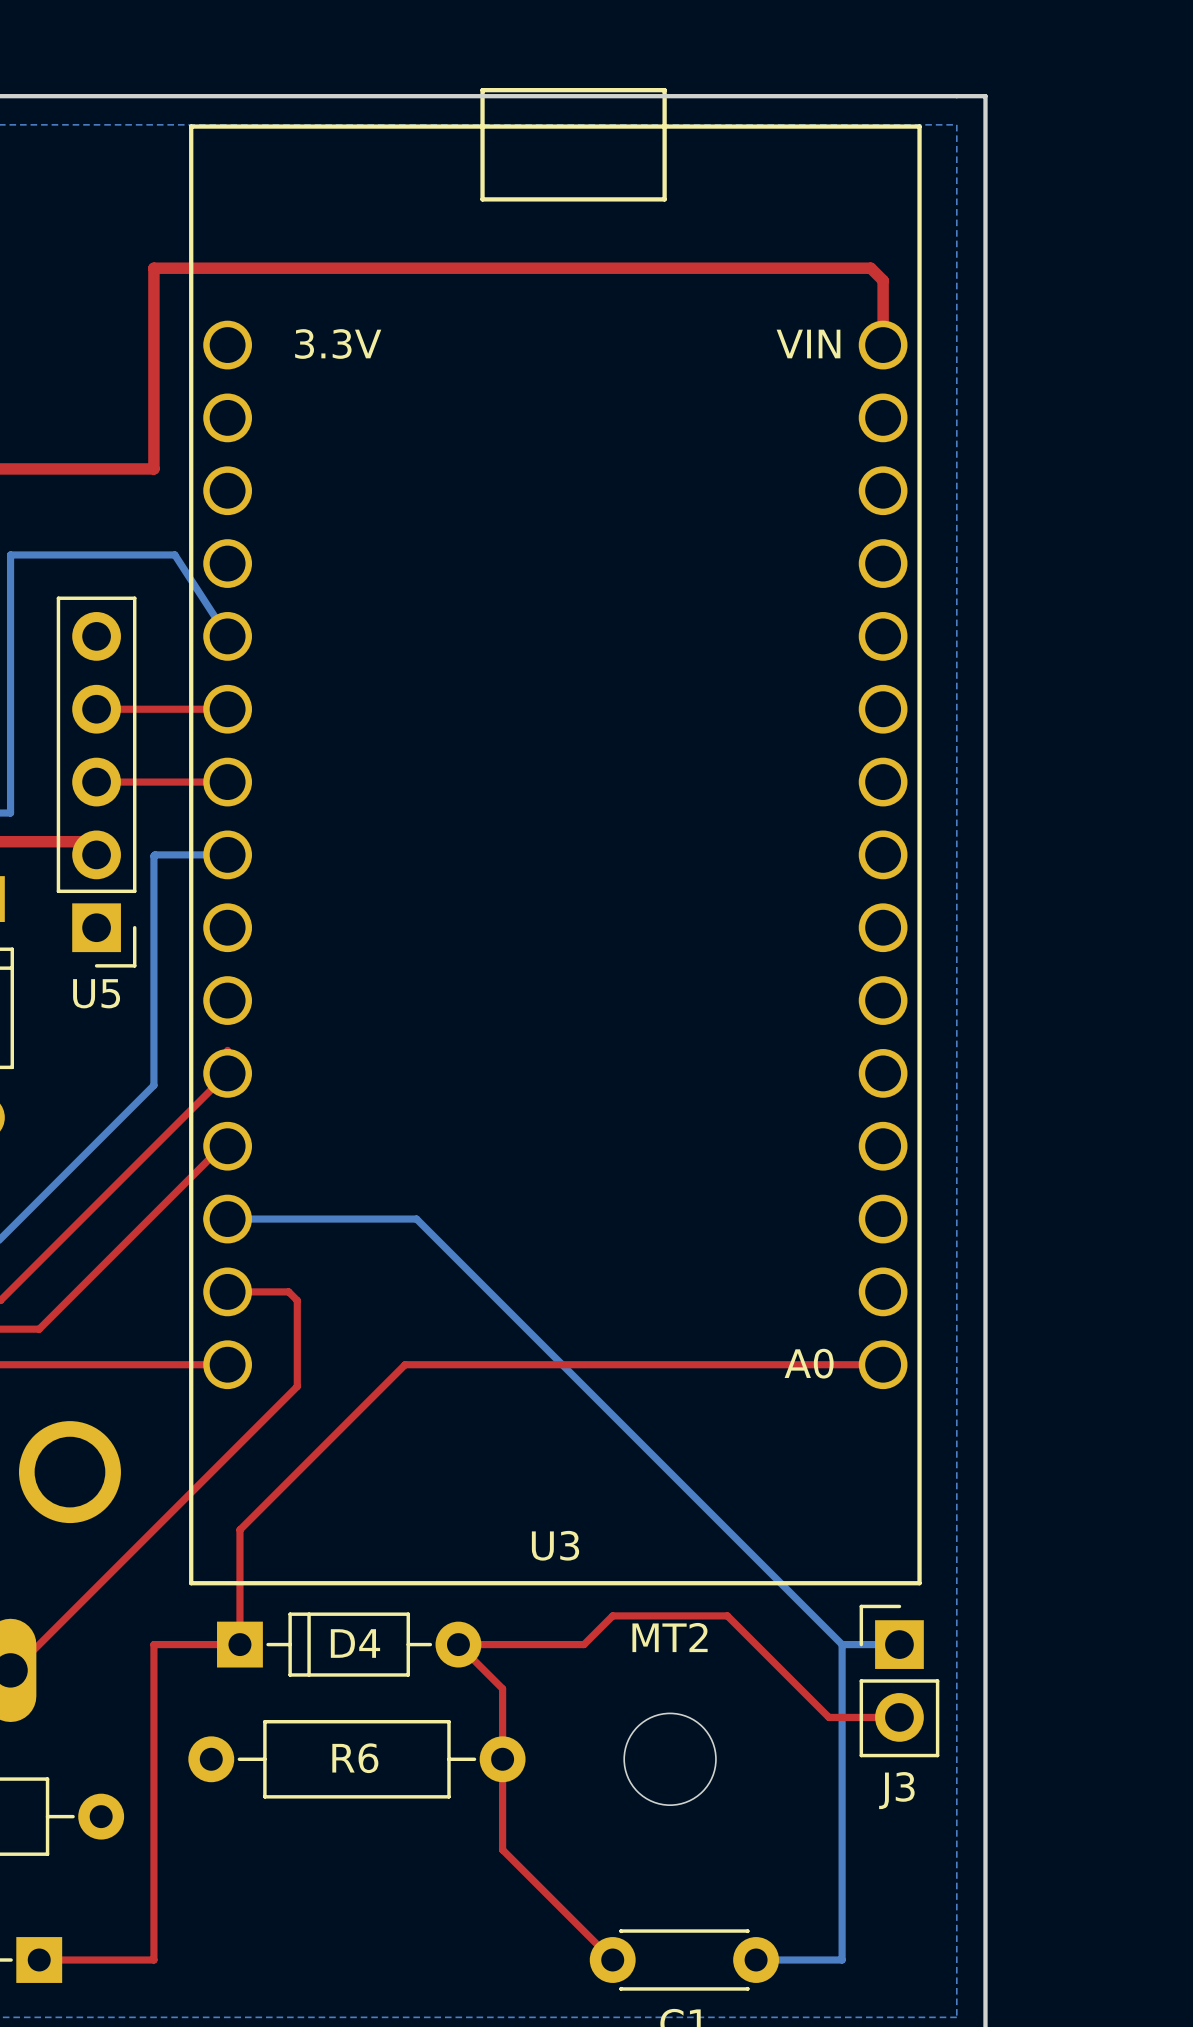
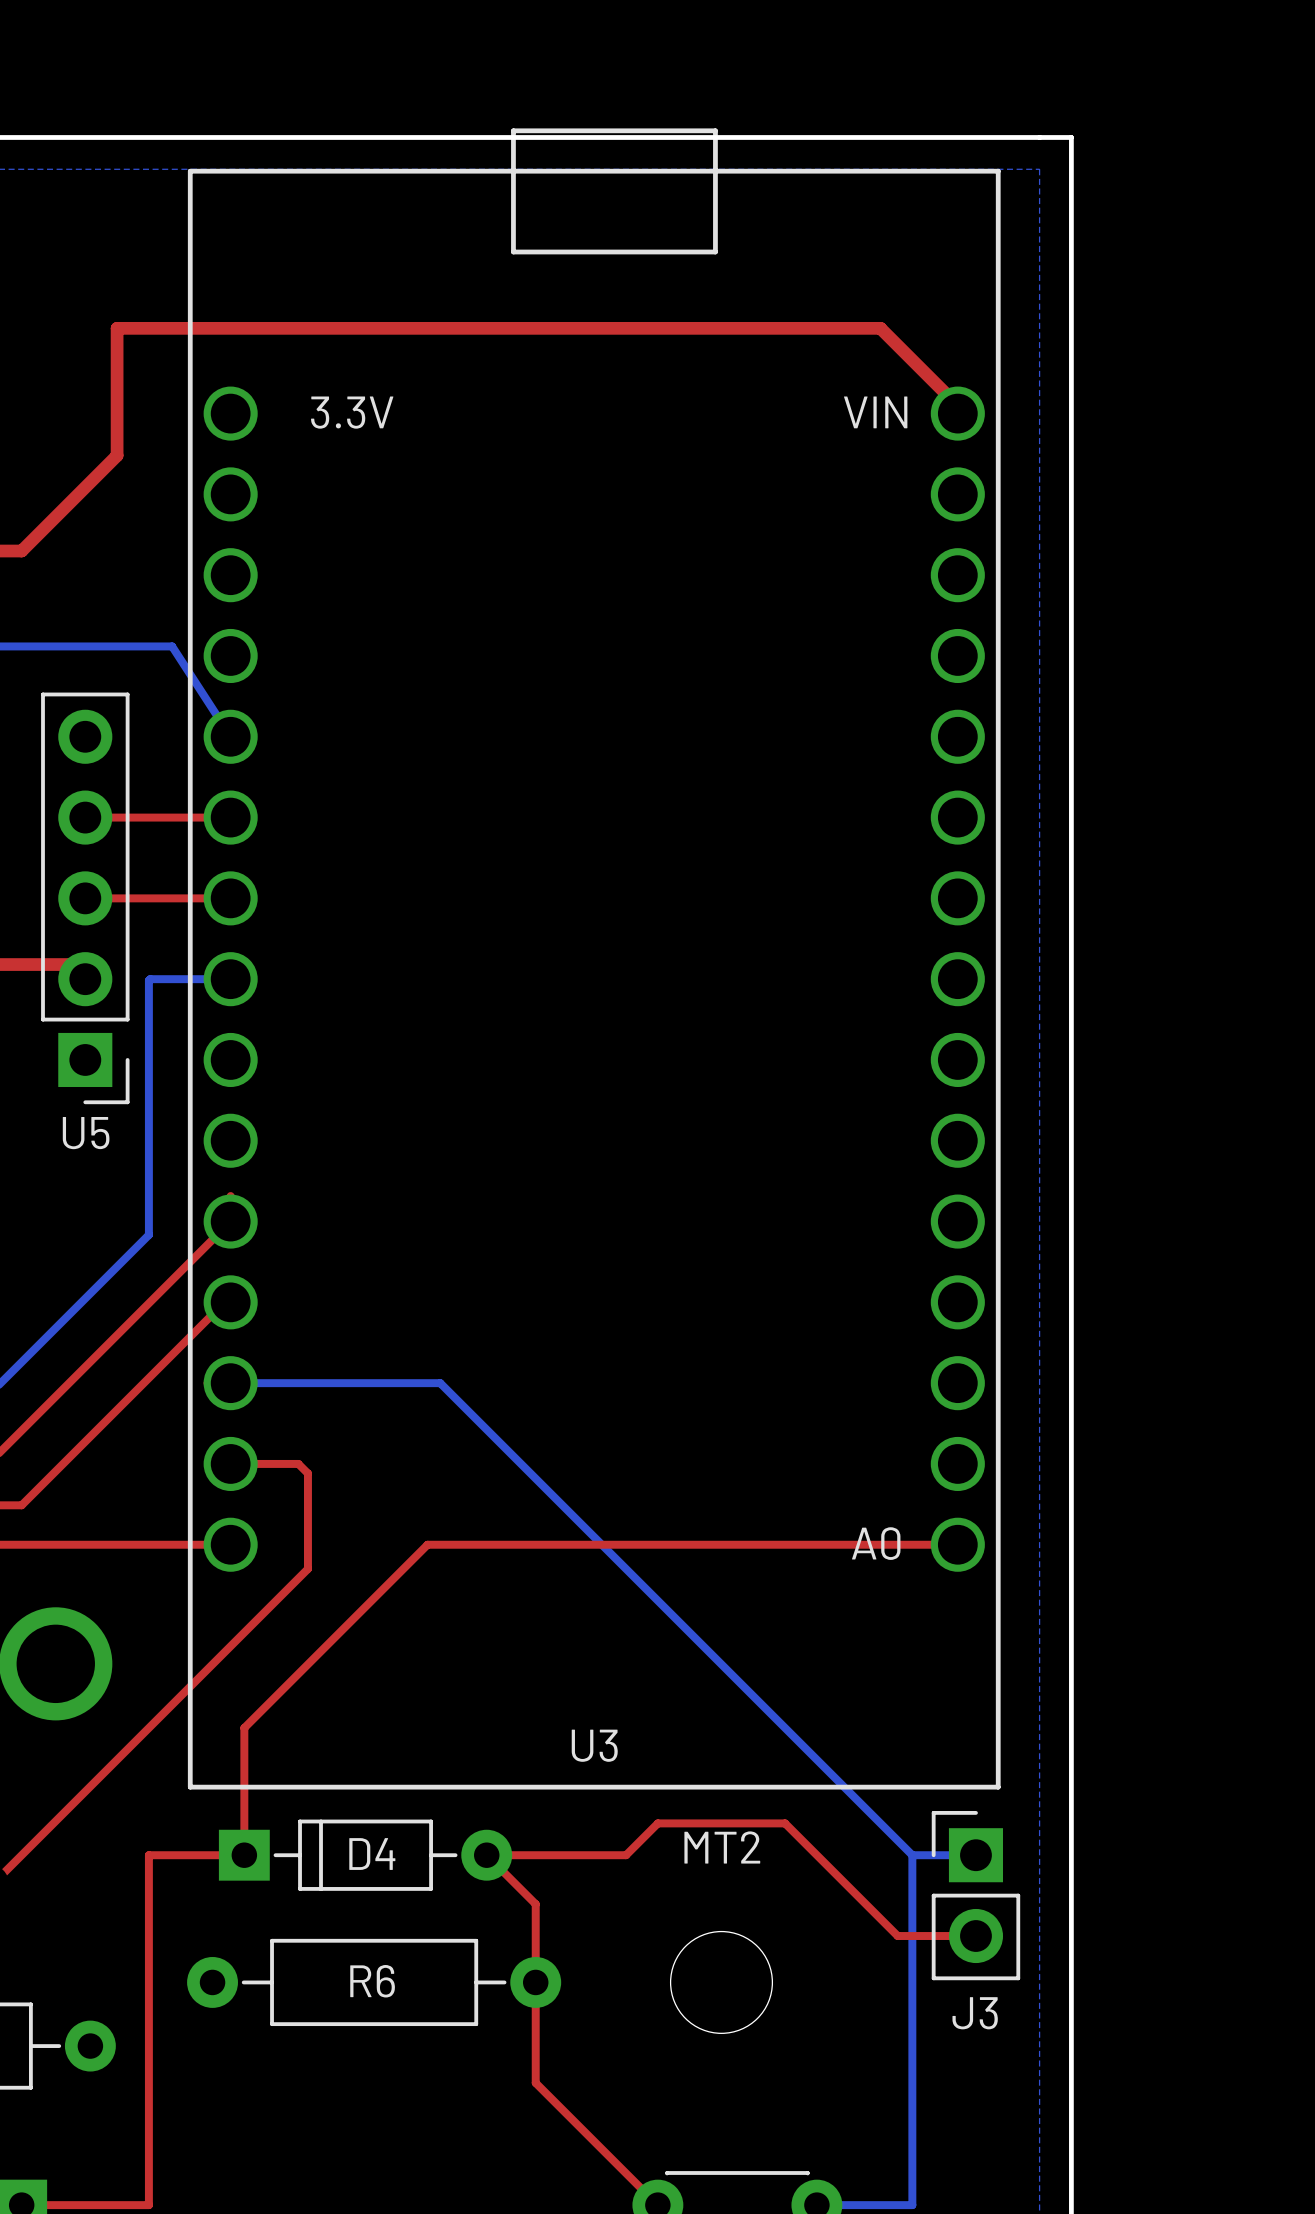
top track: (153, 268) (153, 468) (39, 468) -> (148, 328) (117, 328) (117, 455) (21, 551)
top track: (813, 268) (870, 268) (883, 280) (883, 337) -> (880, 328) (957, 405)

